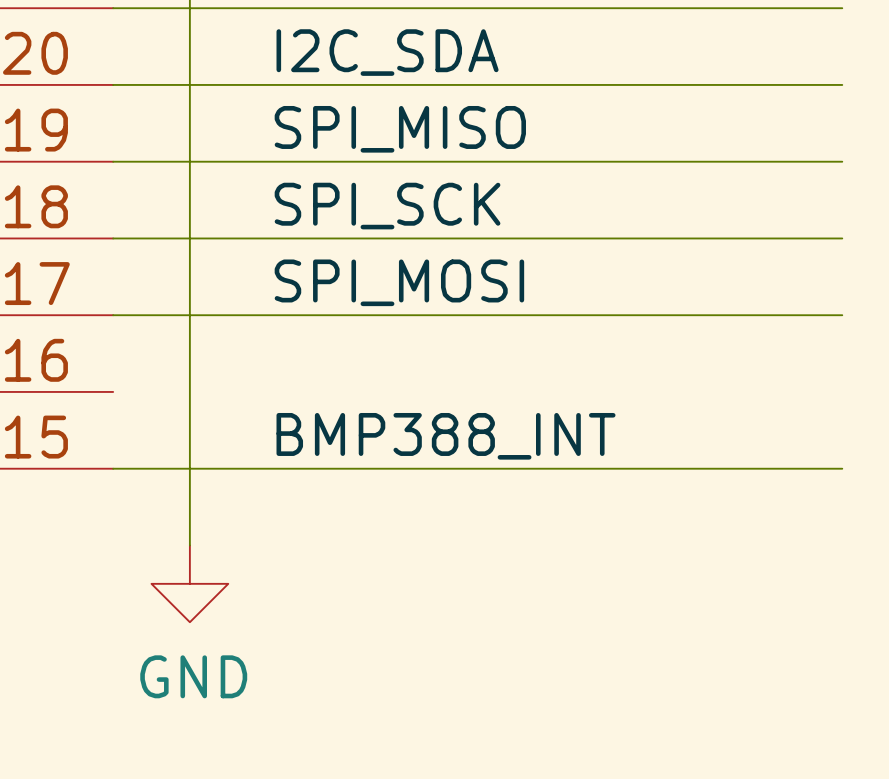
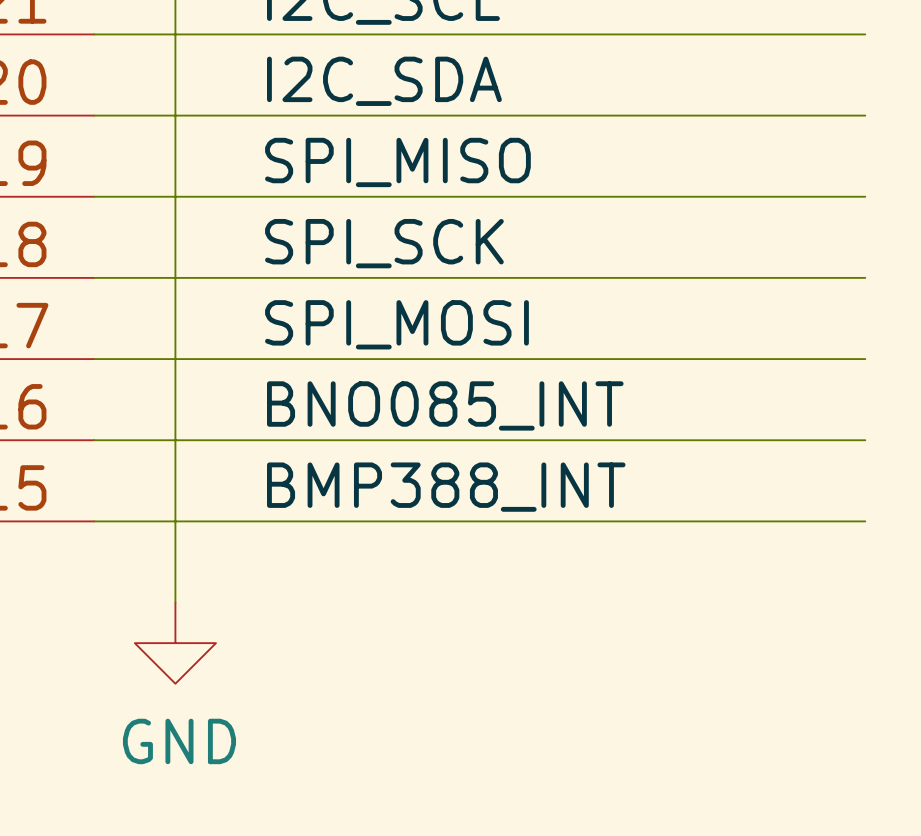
label: none -> BNO085_INT (445, 405)
wire: none -> (94, 440) (865, 440)

